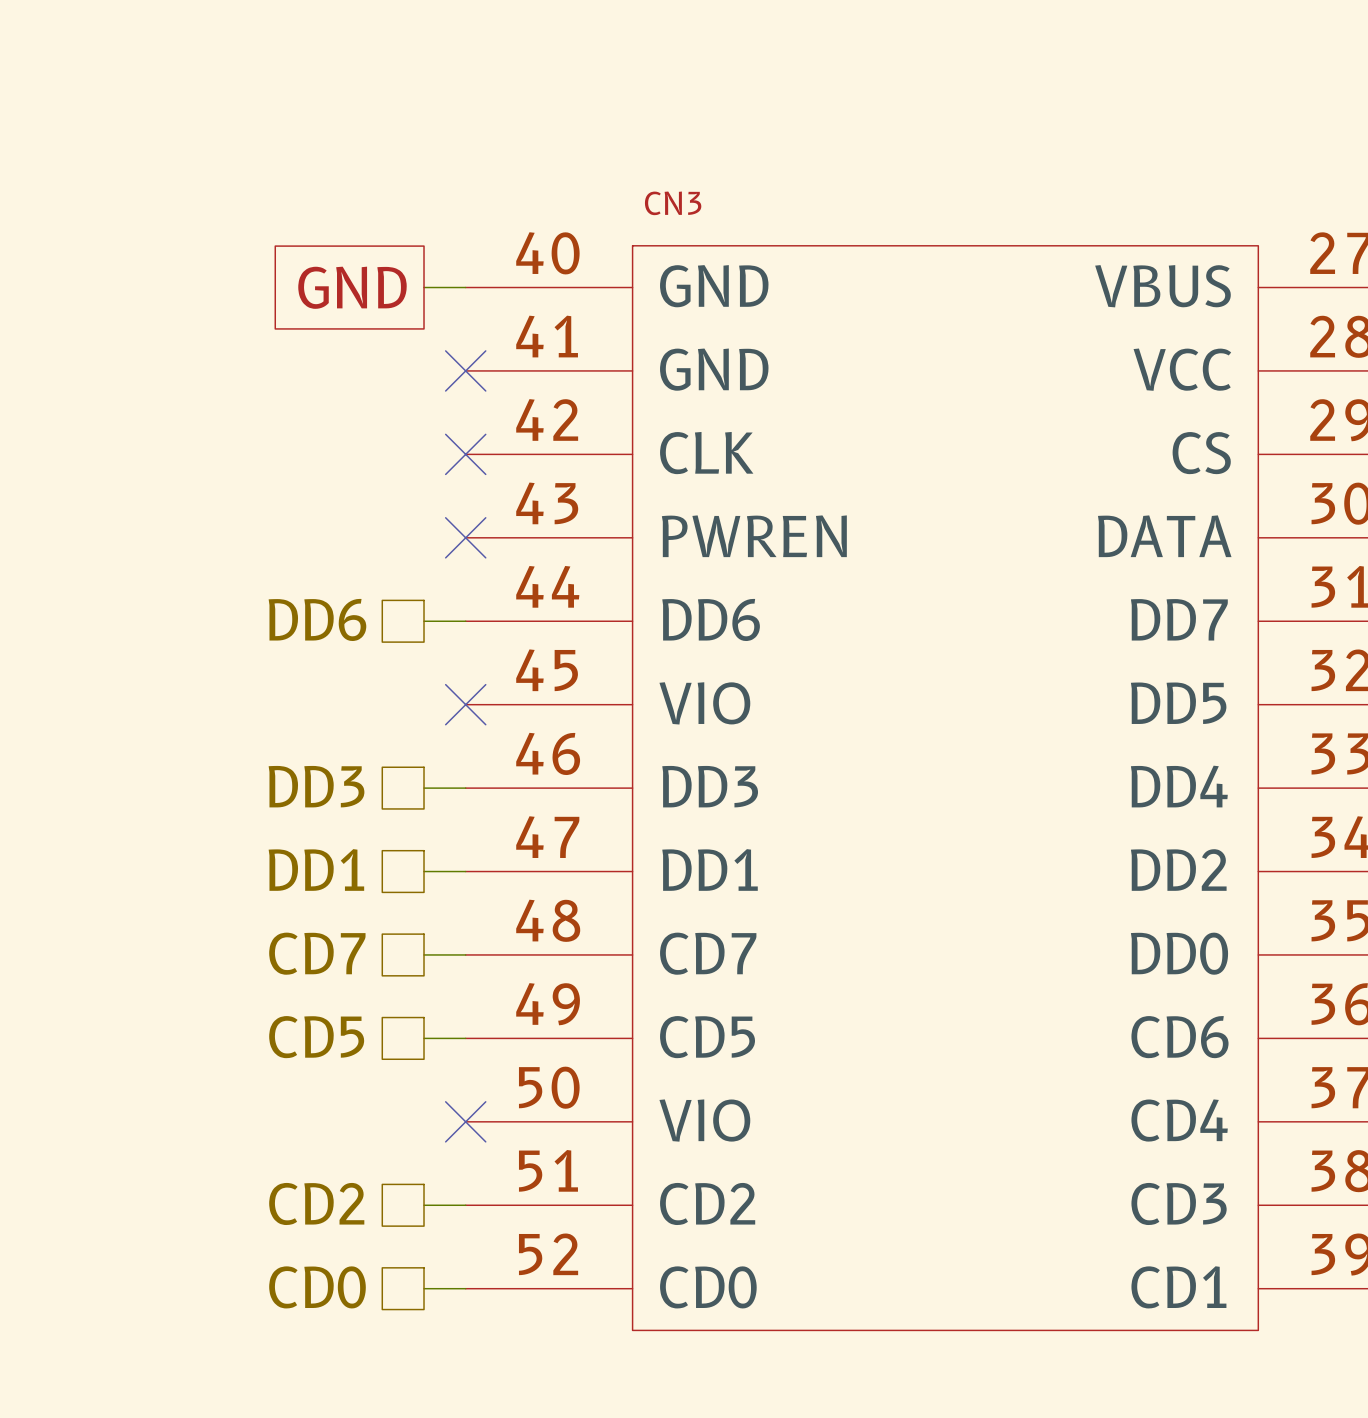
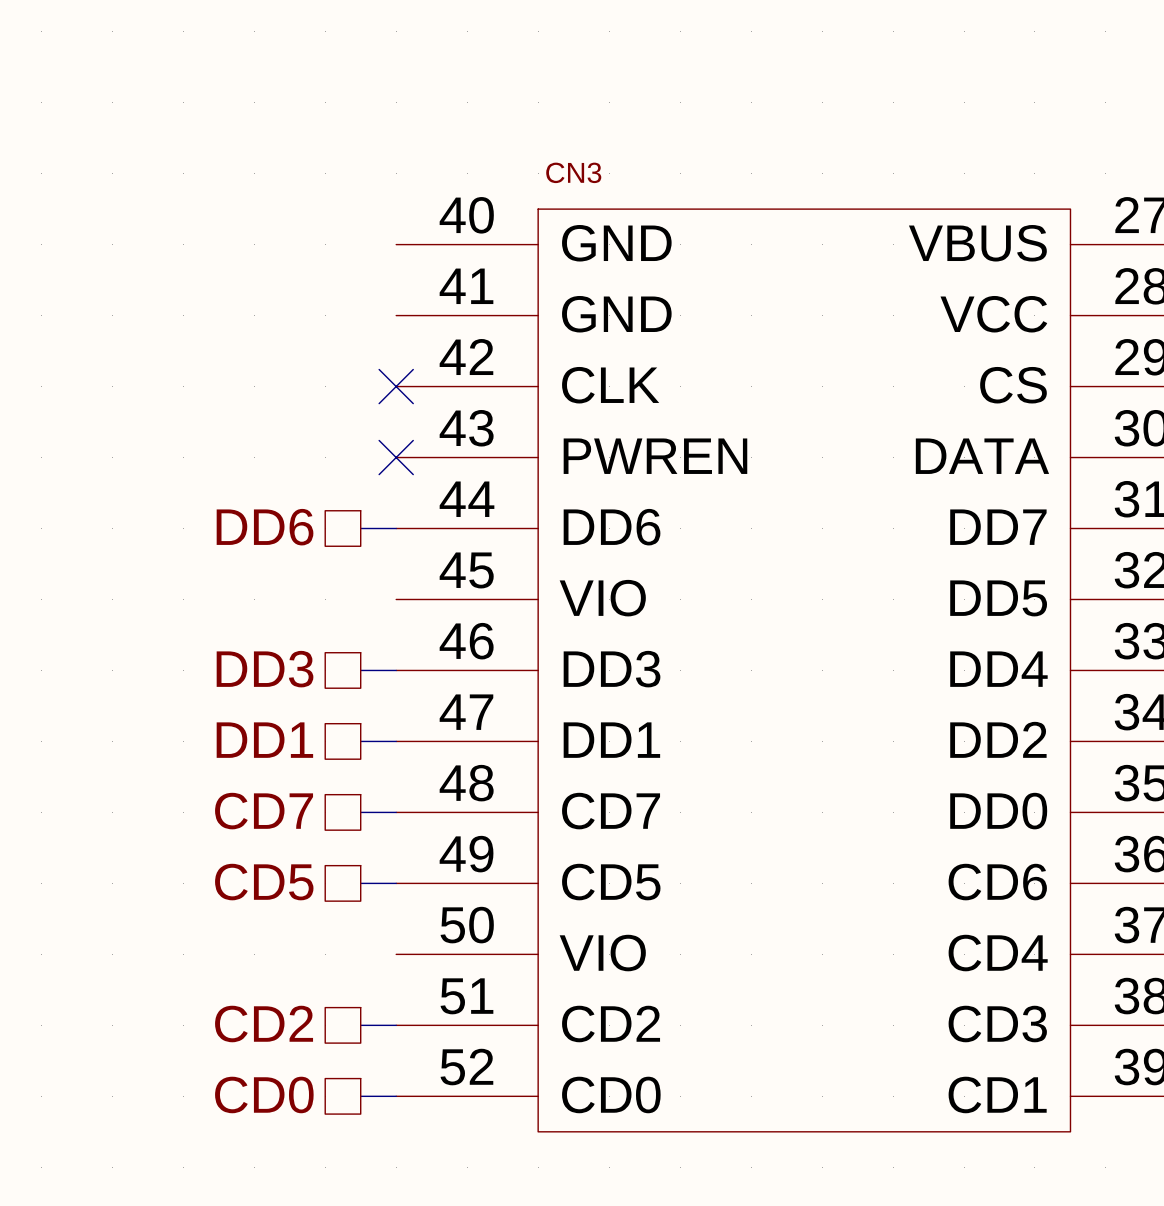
global label: GND (352, 287) -> none
wire: (424, 287) (465, 287) -> none
no-connect mark: (465, 370) -> none
no-connect mark: (465, 704) -> none
no-connect mark: (465, 1121) -> none

